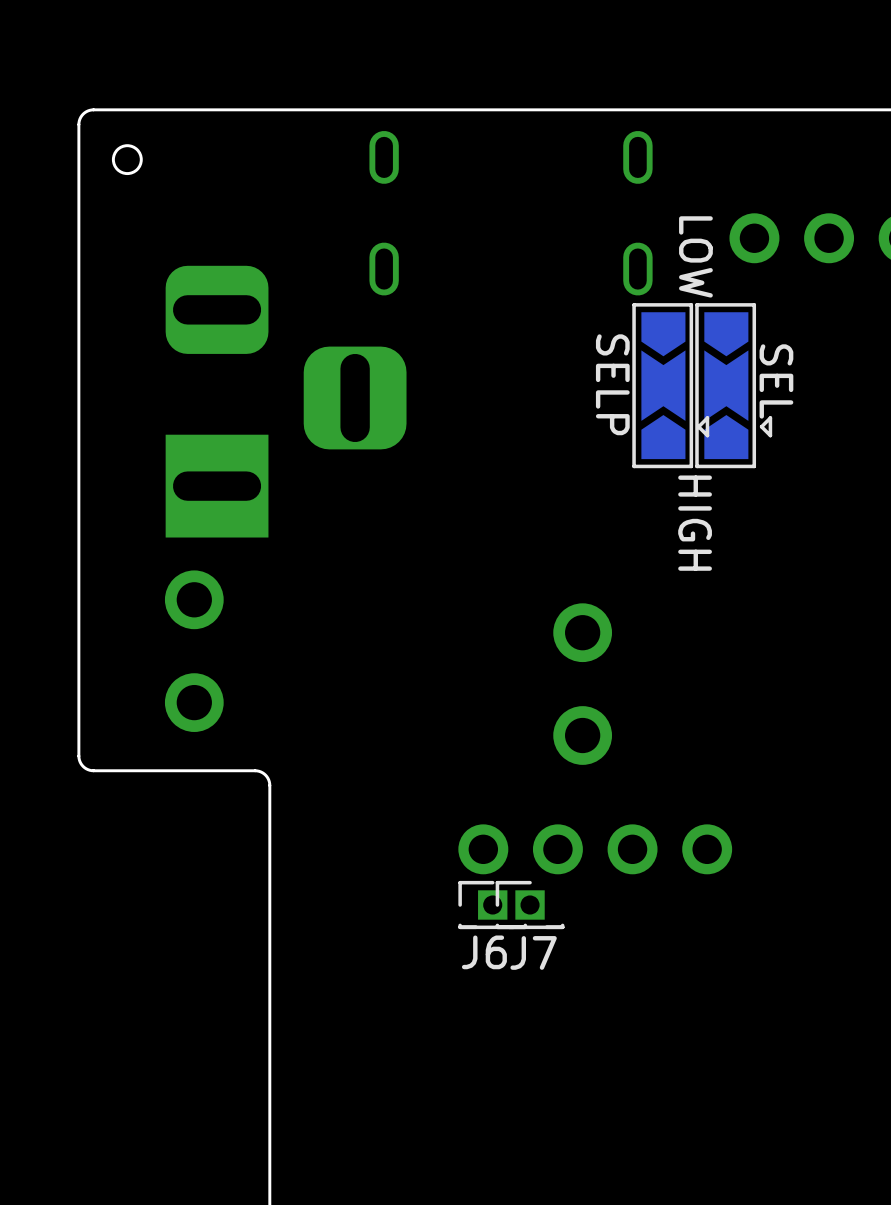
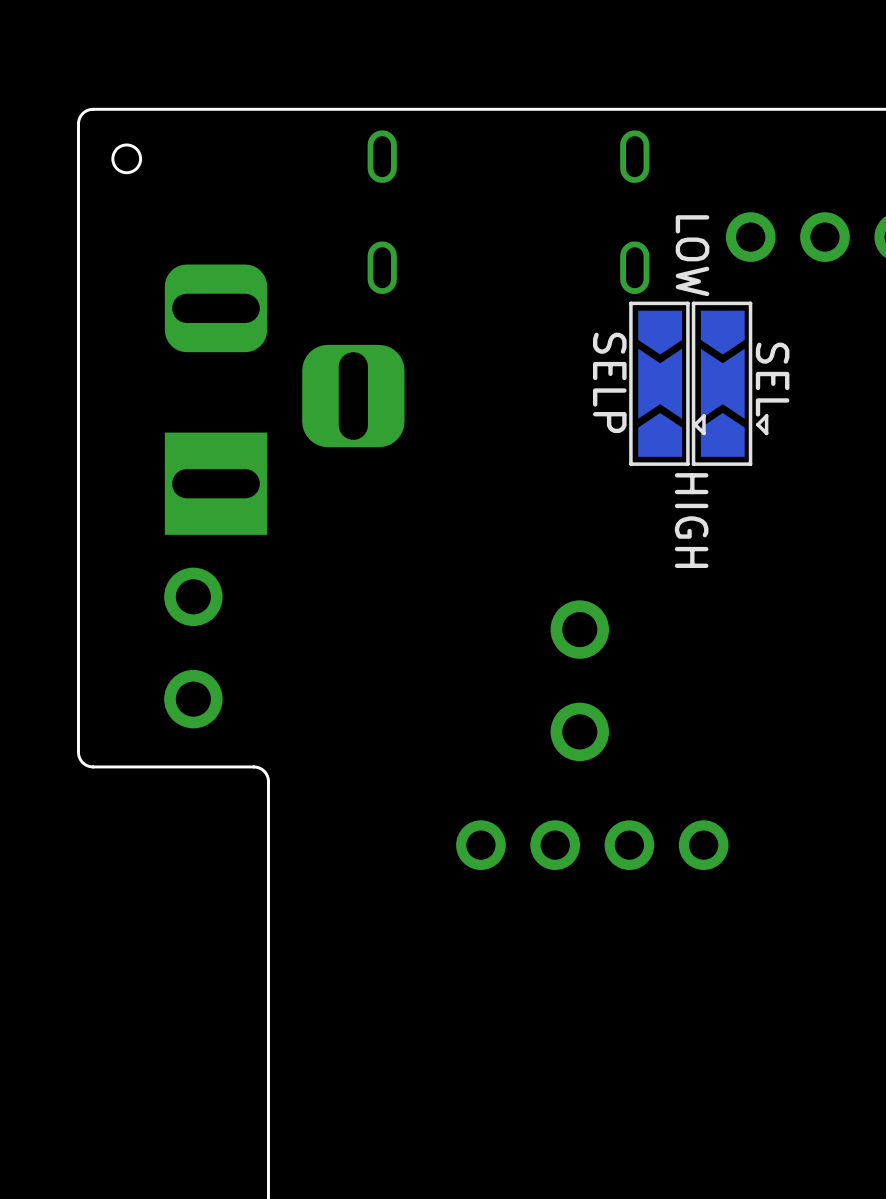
J6: (492, 904) -> none
J7: (530, 904) -> none

